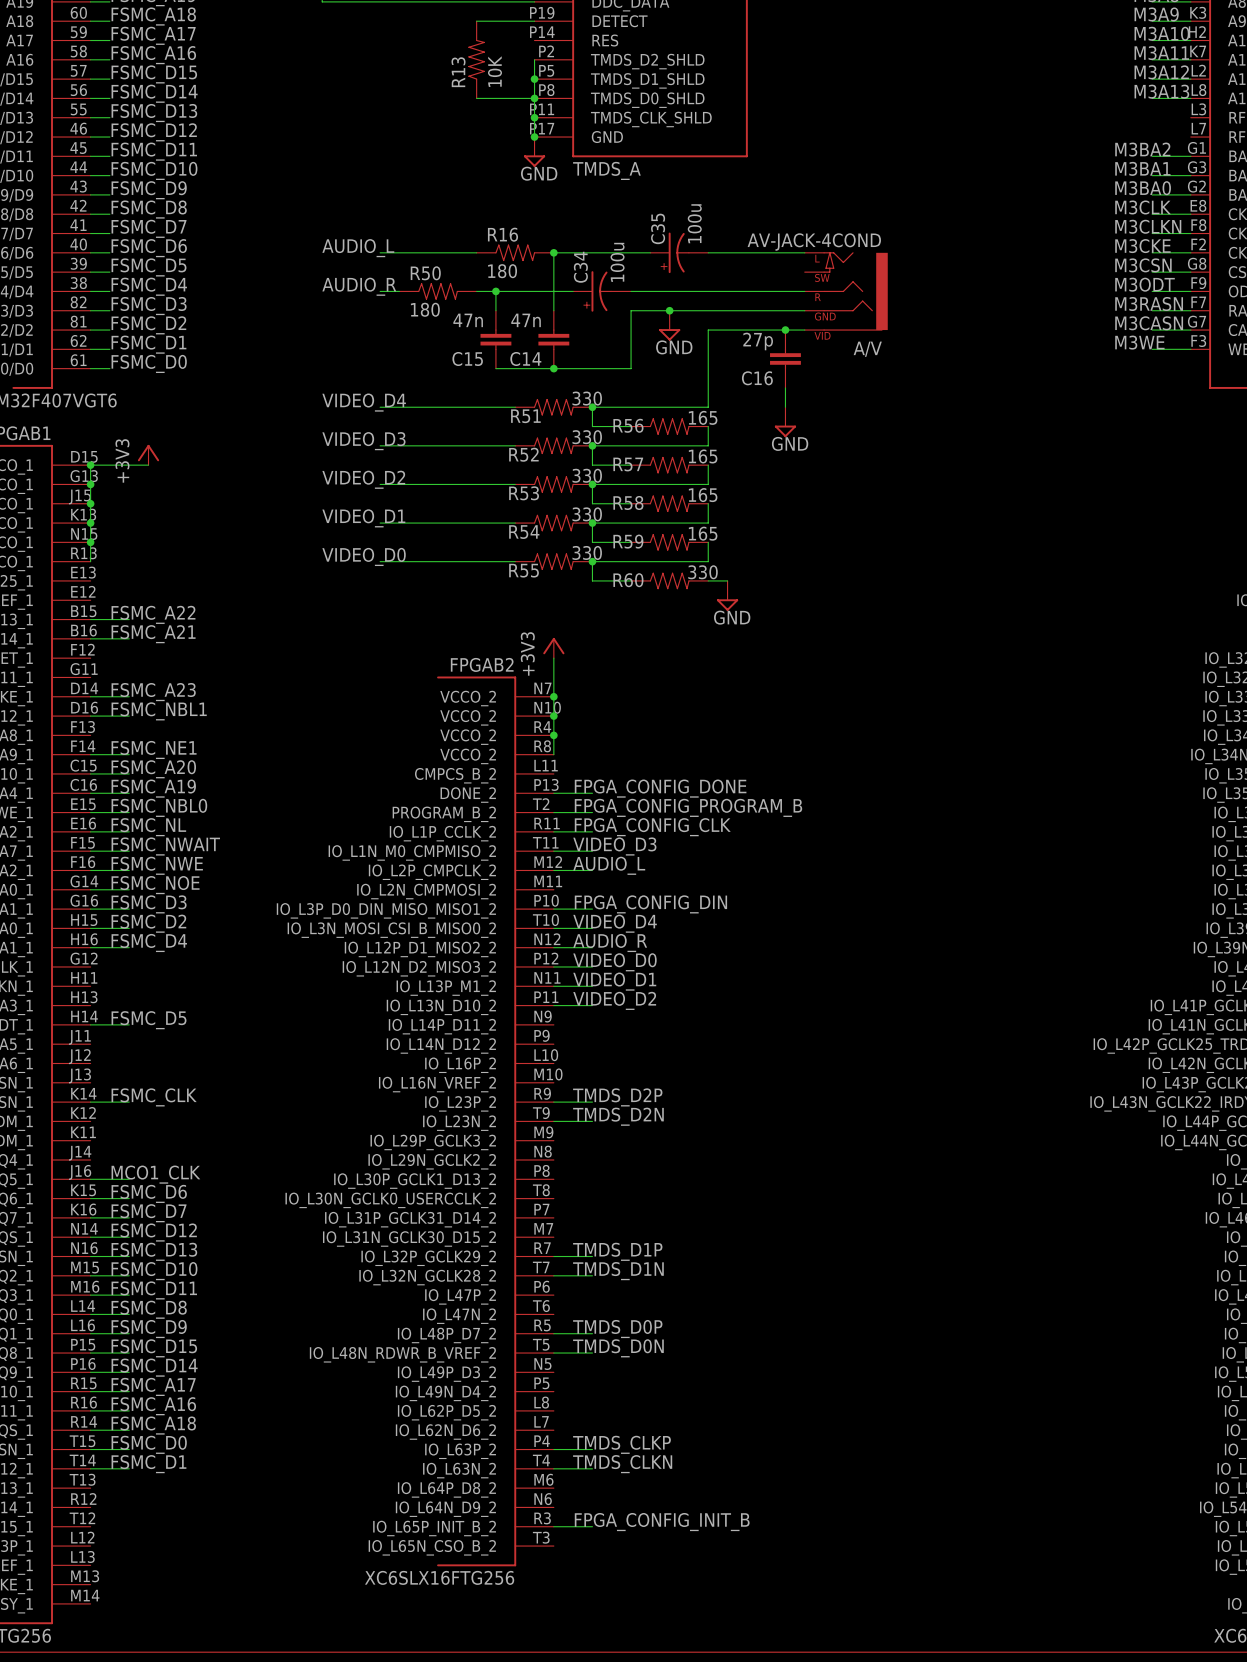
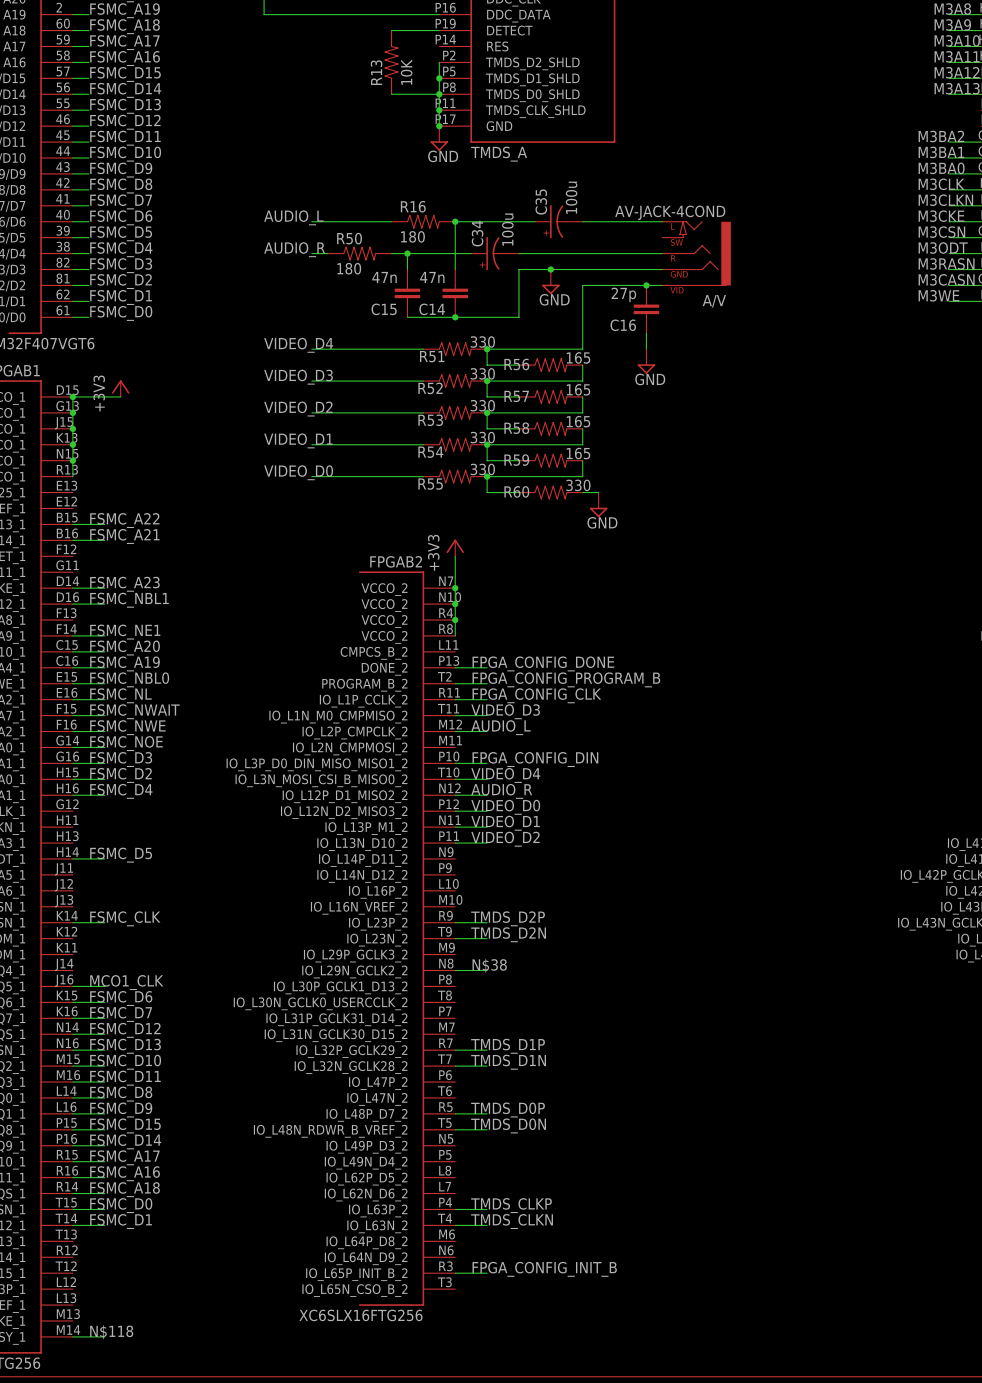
label: none -> N$38 (489, 965)
wire: none -> (455, 970) (487, 970)
label: none -> N$118 (111, 1332)
wire: none -> (72, 1336) (104, 1336)

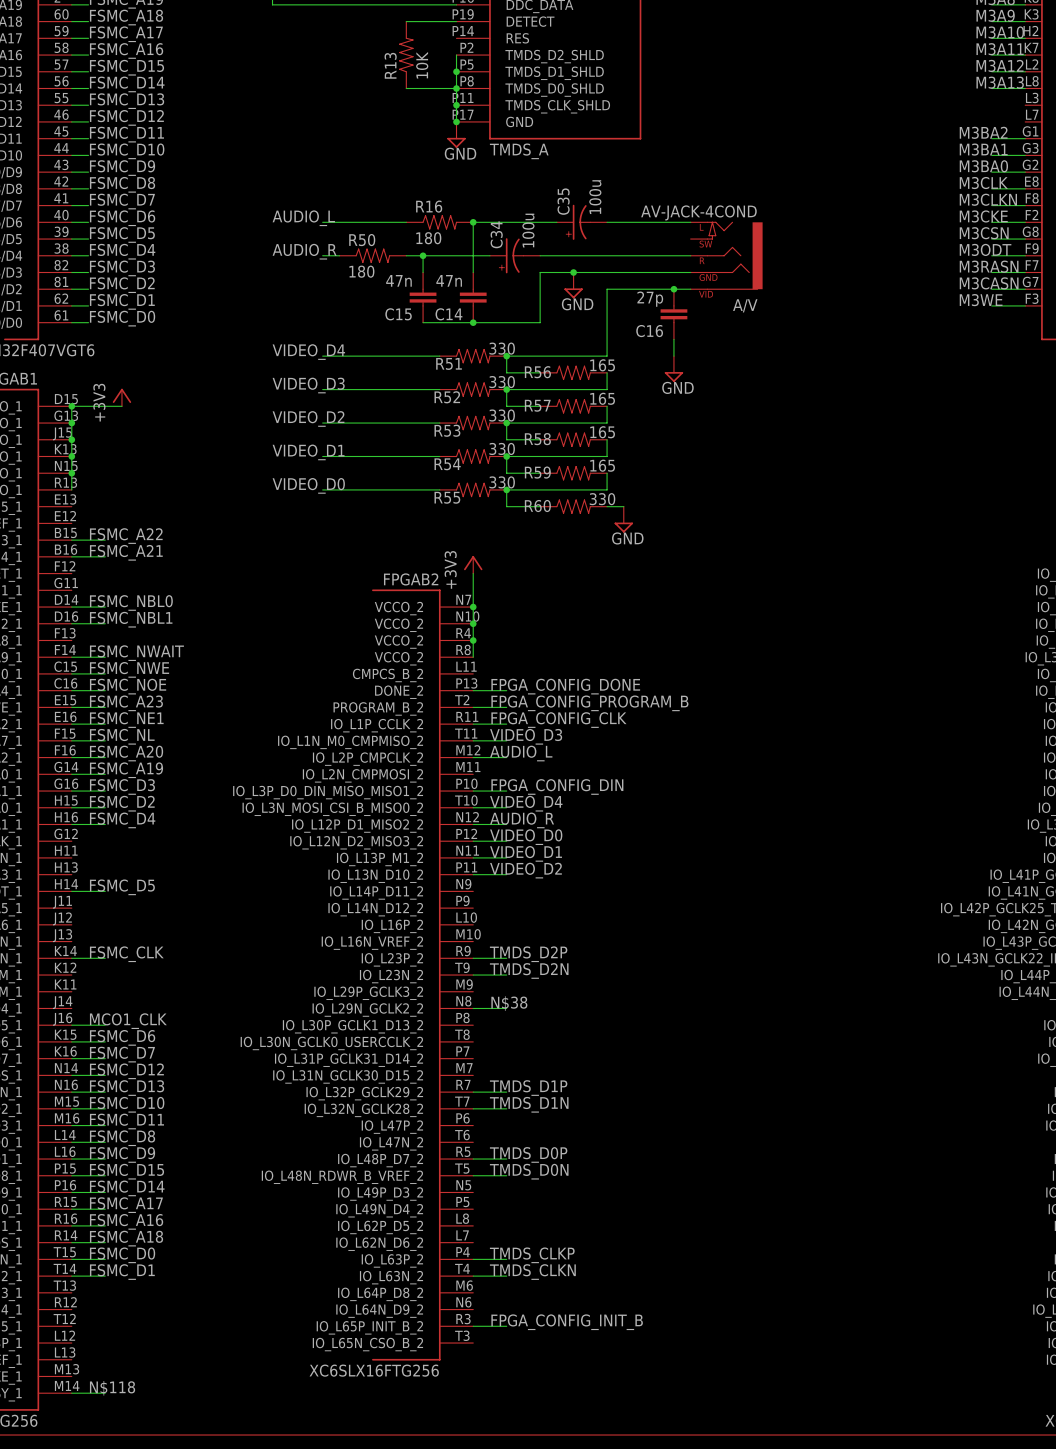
label: FSMC_A23 (124, 584) -> FSMC_NBL0 (131, 602)
label: FSMC_NE1 (125, 632) -> FSMC_NWAIT (136, 653)
label: FSMC_A20 (125, 648) -> FSMC_NWE (129, 669)
label: FSMC_A19 (125, 663) -> FSMC_NOE (128, 686)
label: FSMC_NBL0 (129, 679) -> FSMC_A23 (126, 703)
label: FSMC_NL (120, 695) -> FSMC_NE1 (126, 720)
label: FSMC_NWAIT (134, 711) -> FSMC_NL (122, 736)
label: FSMC_NWE (127, 727) -> FSMC_A20 (126, 753)
label: FSMC_NOE (126, 743) -> FSMC_A19 (126, 770)

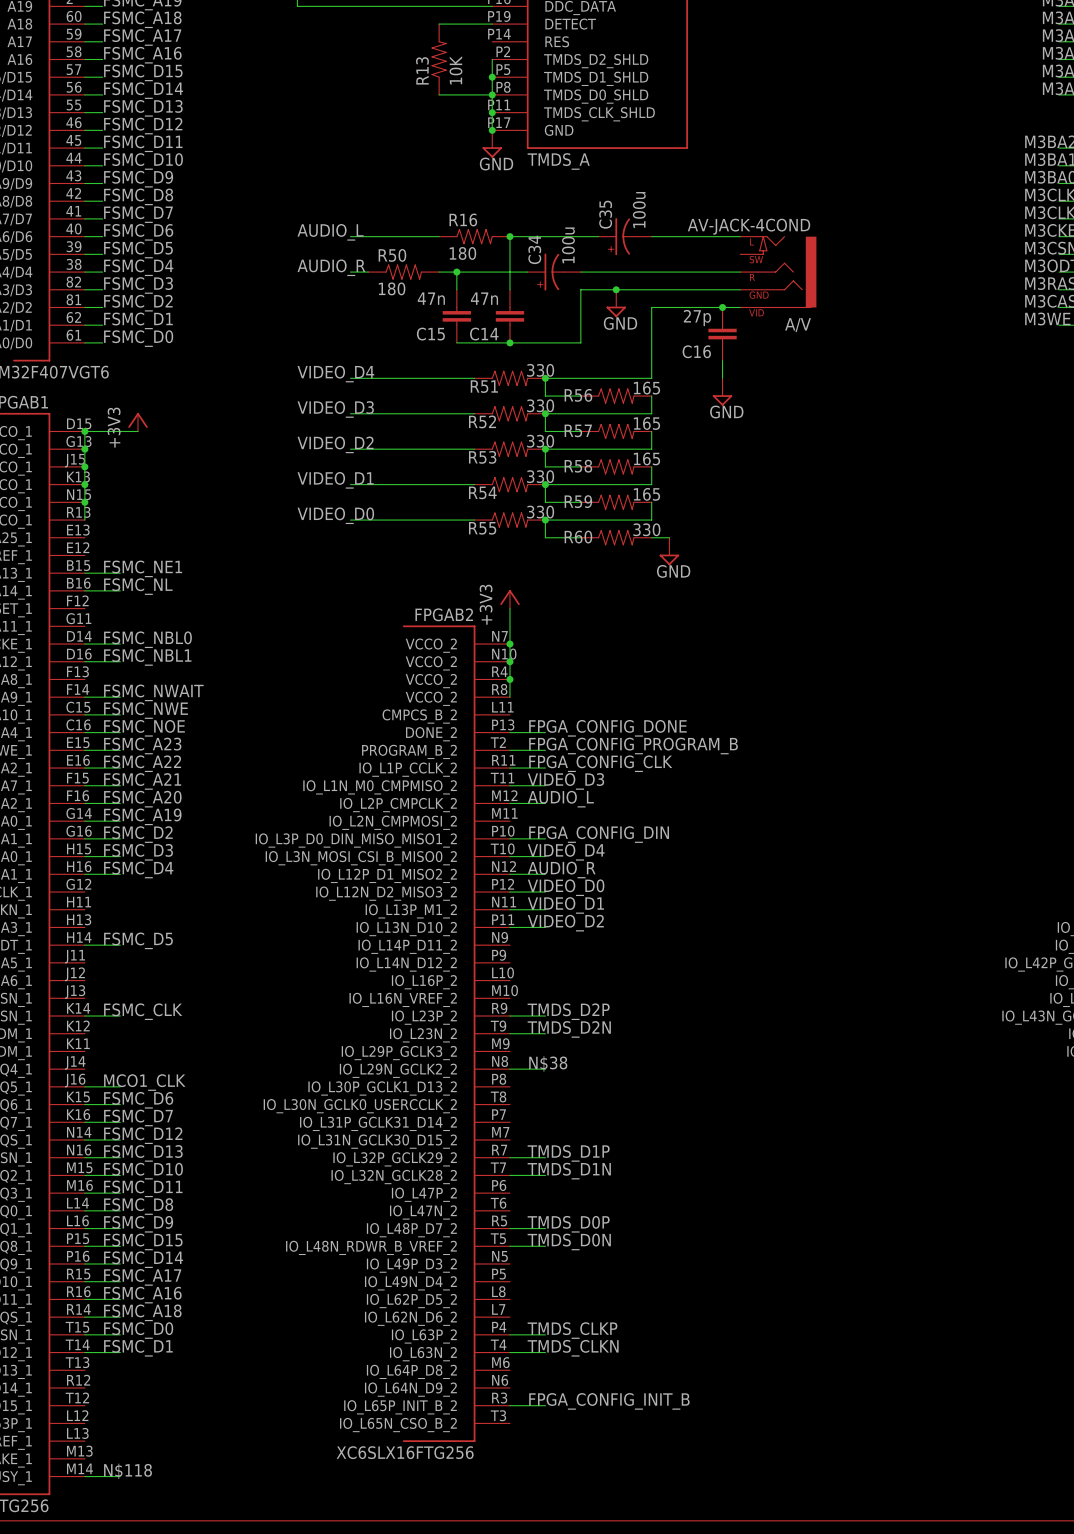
label: FSMC_A22 (126, 536) -> FSMC_NE1 (143, 568)
label: FSMC_A21 (126, 552) -> FSMC_NL (138, 586)
label: FSMC_NE1 (126, 720) -> FSMC_A22 (142, 763)
label: FSMC_NL (122, 736) -> FSMC_A21 (142, 781)
label: FSMC_D3 (122, 786) -> FSMC_D2 (138, 834)
label: FSMC_D2 (122, 803) -> FSMC_D3 (138, 852)

